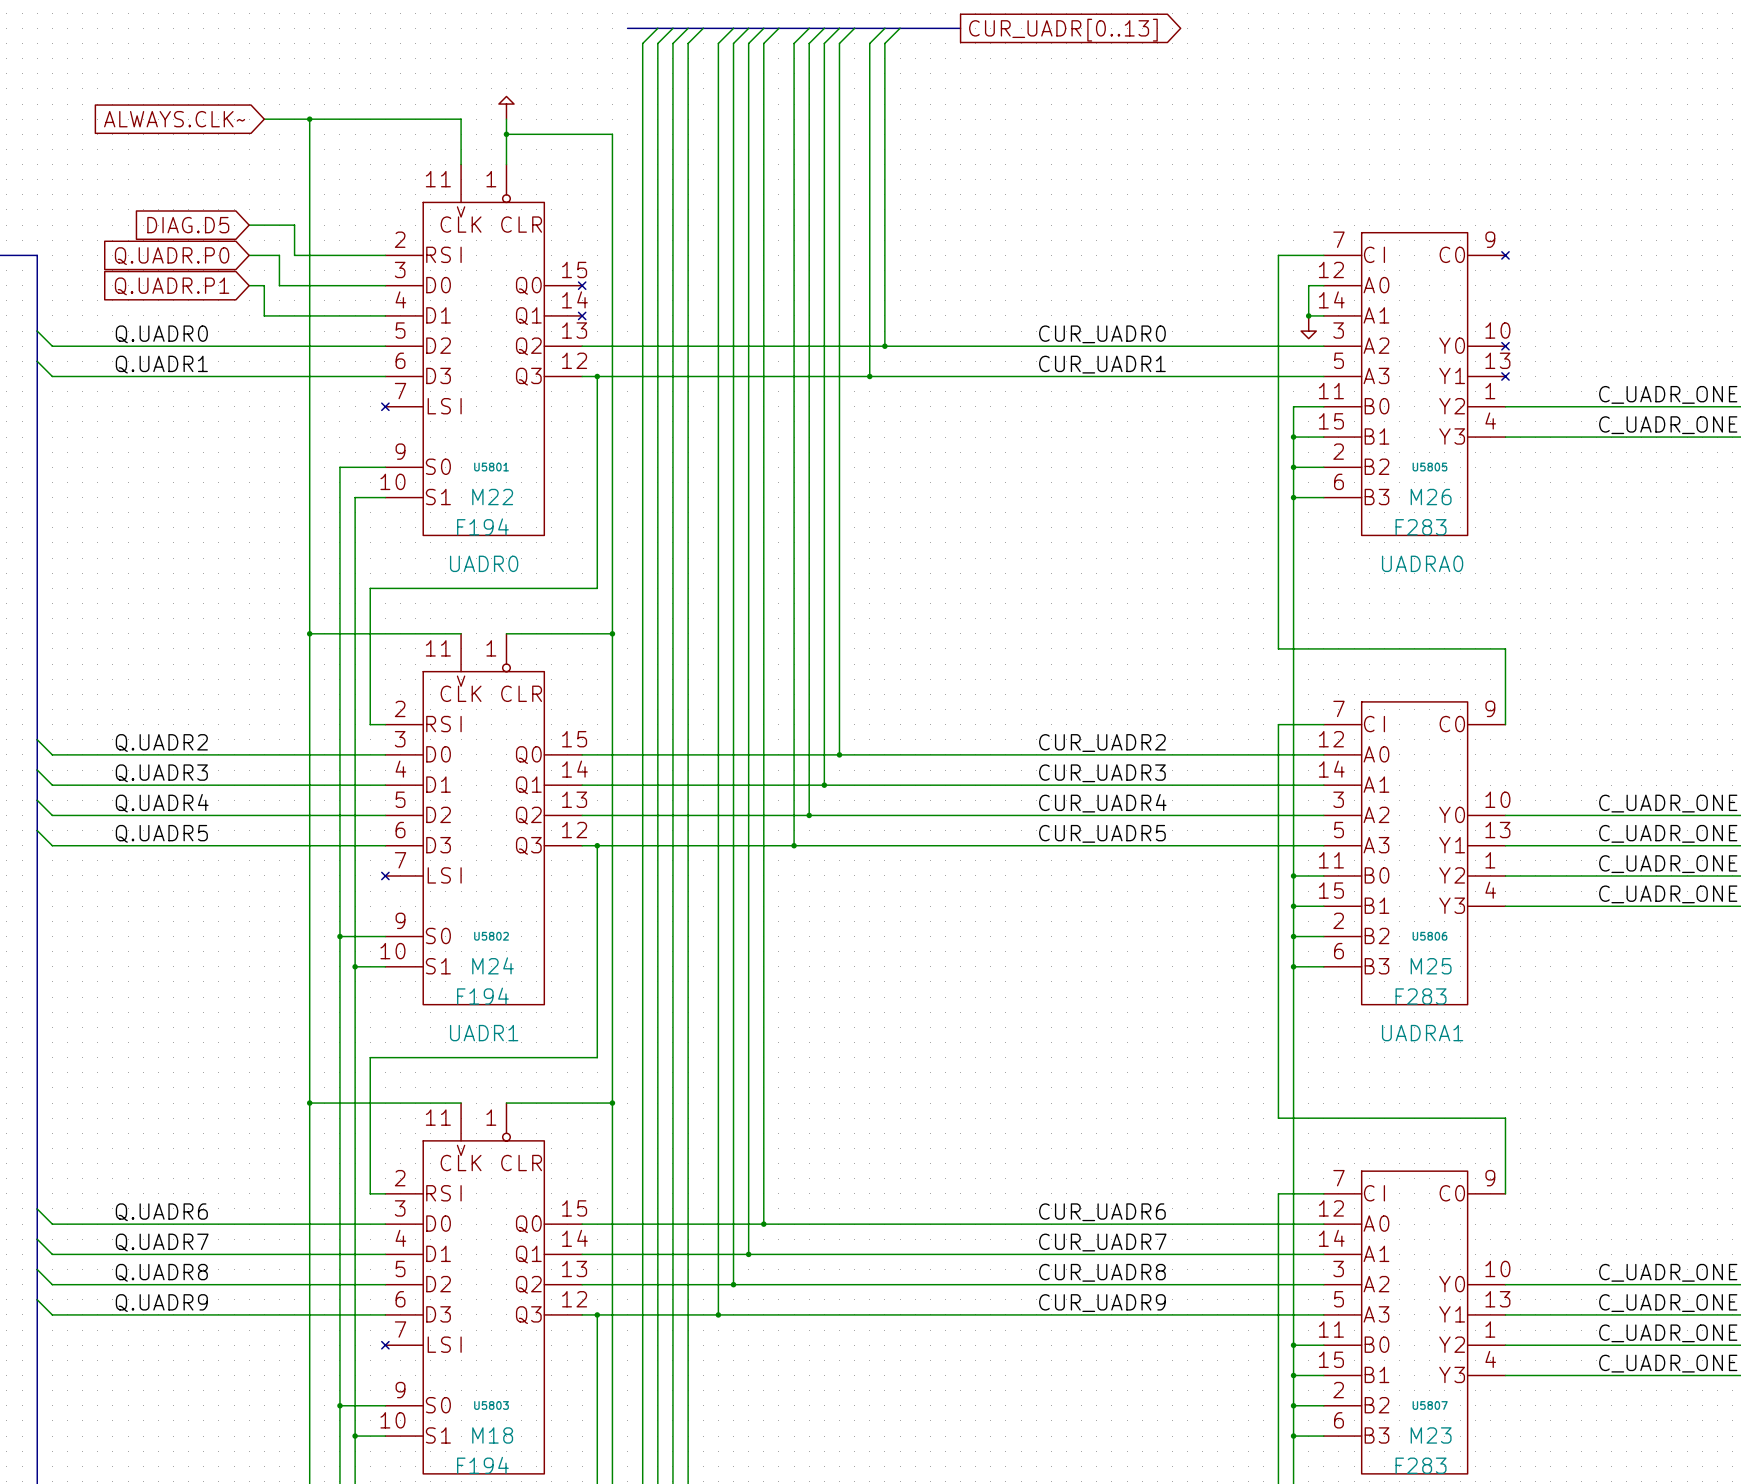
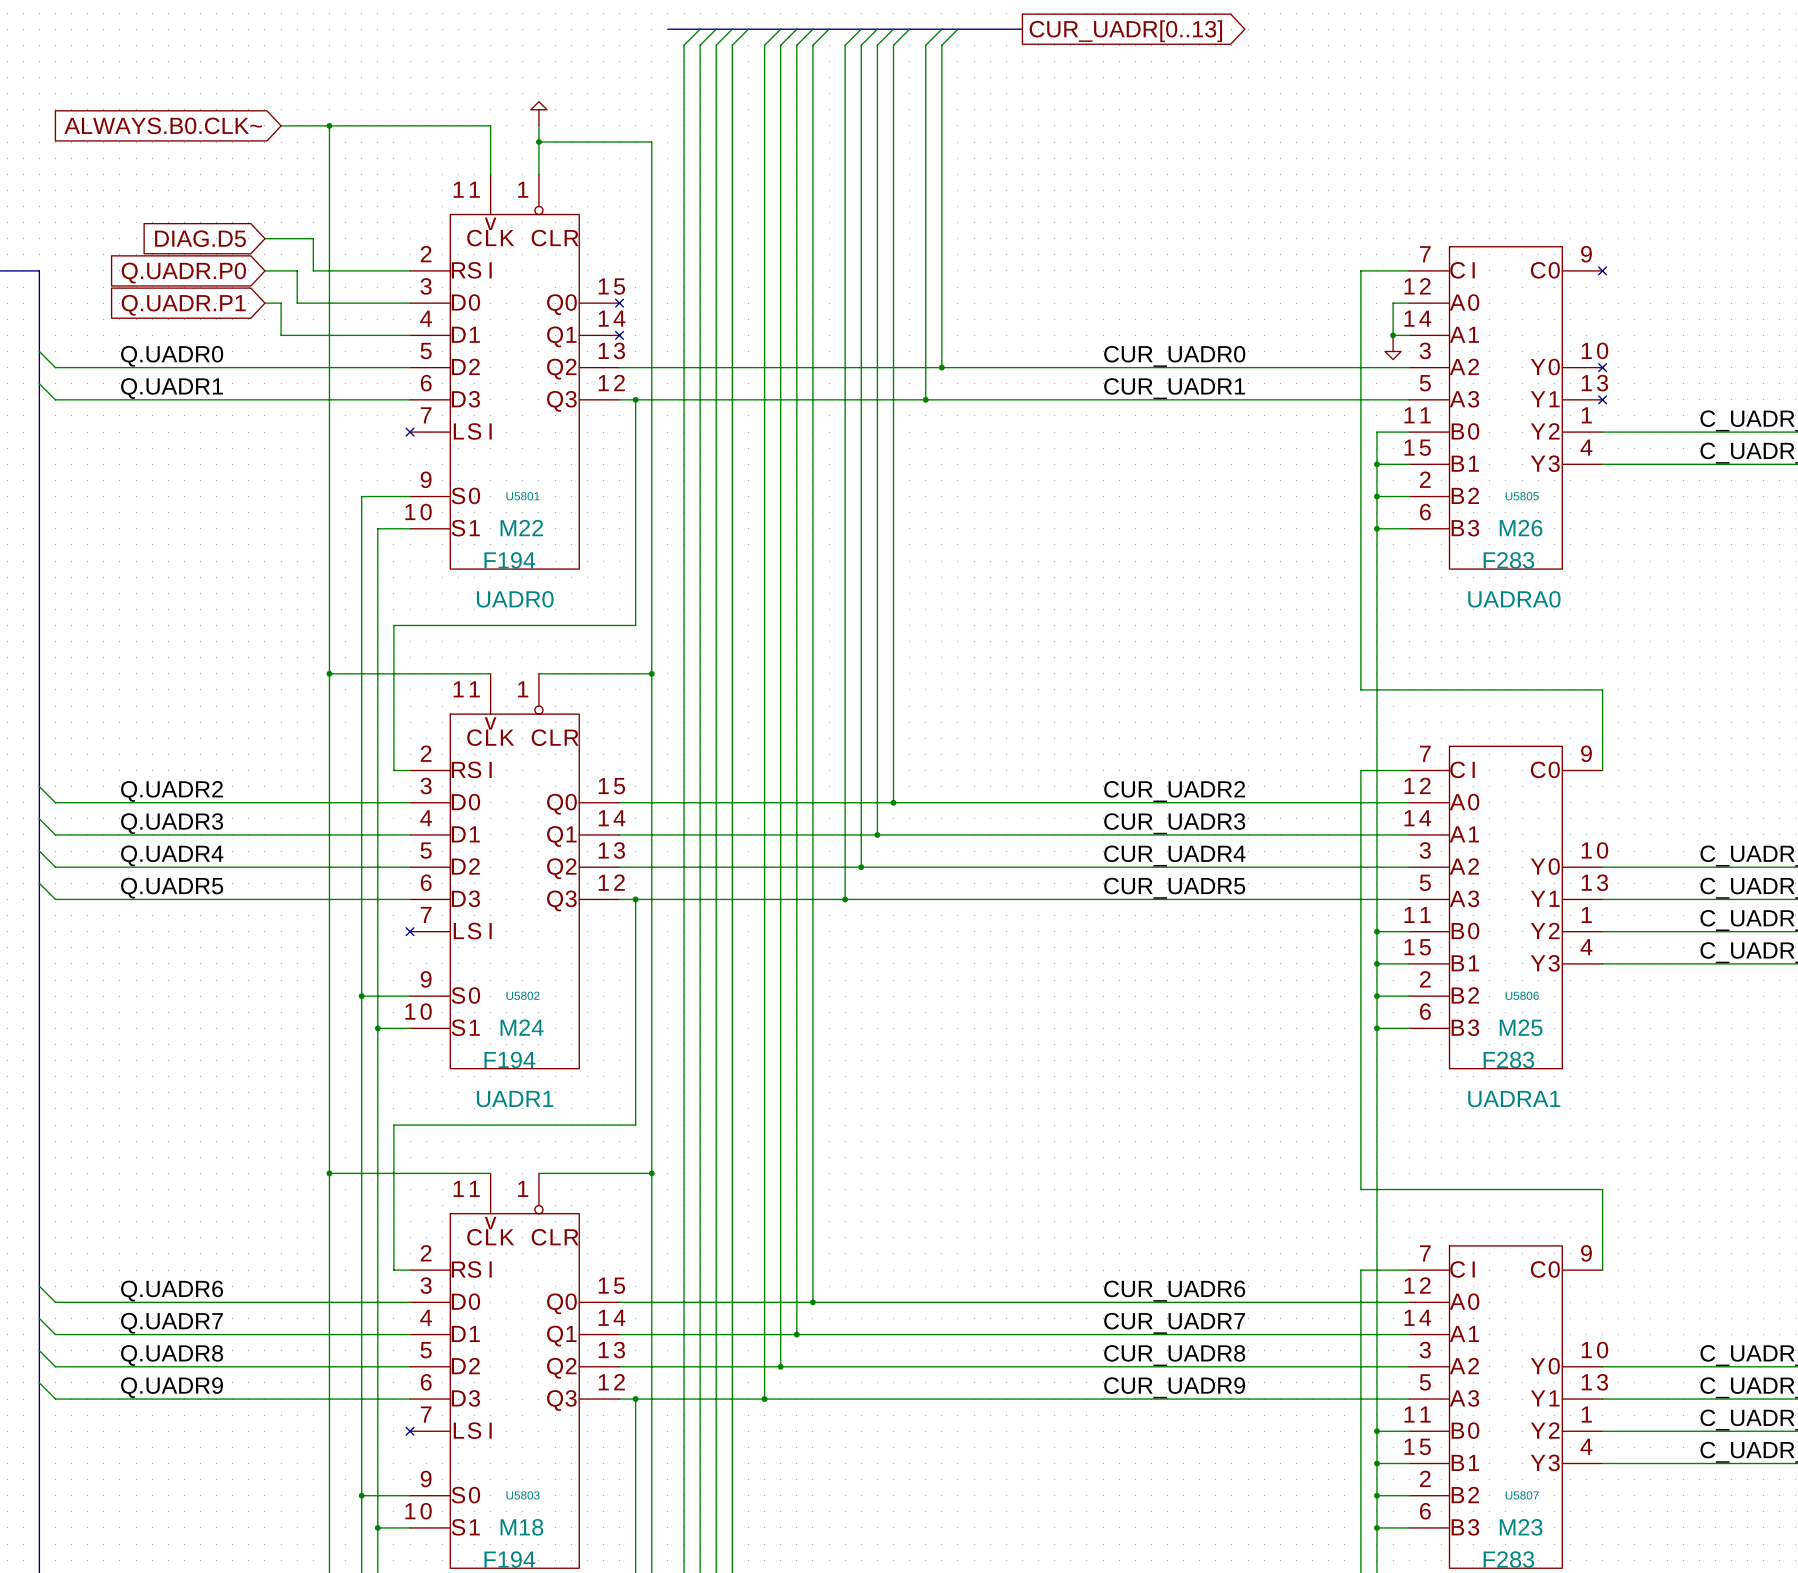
global label: ALWAYS.CLK~ (174, 119) -> ALWAYS.B0.CLK~ (163, 125)

